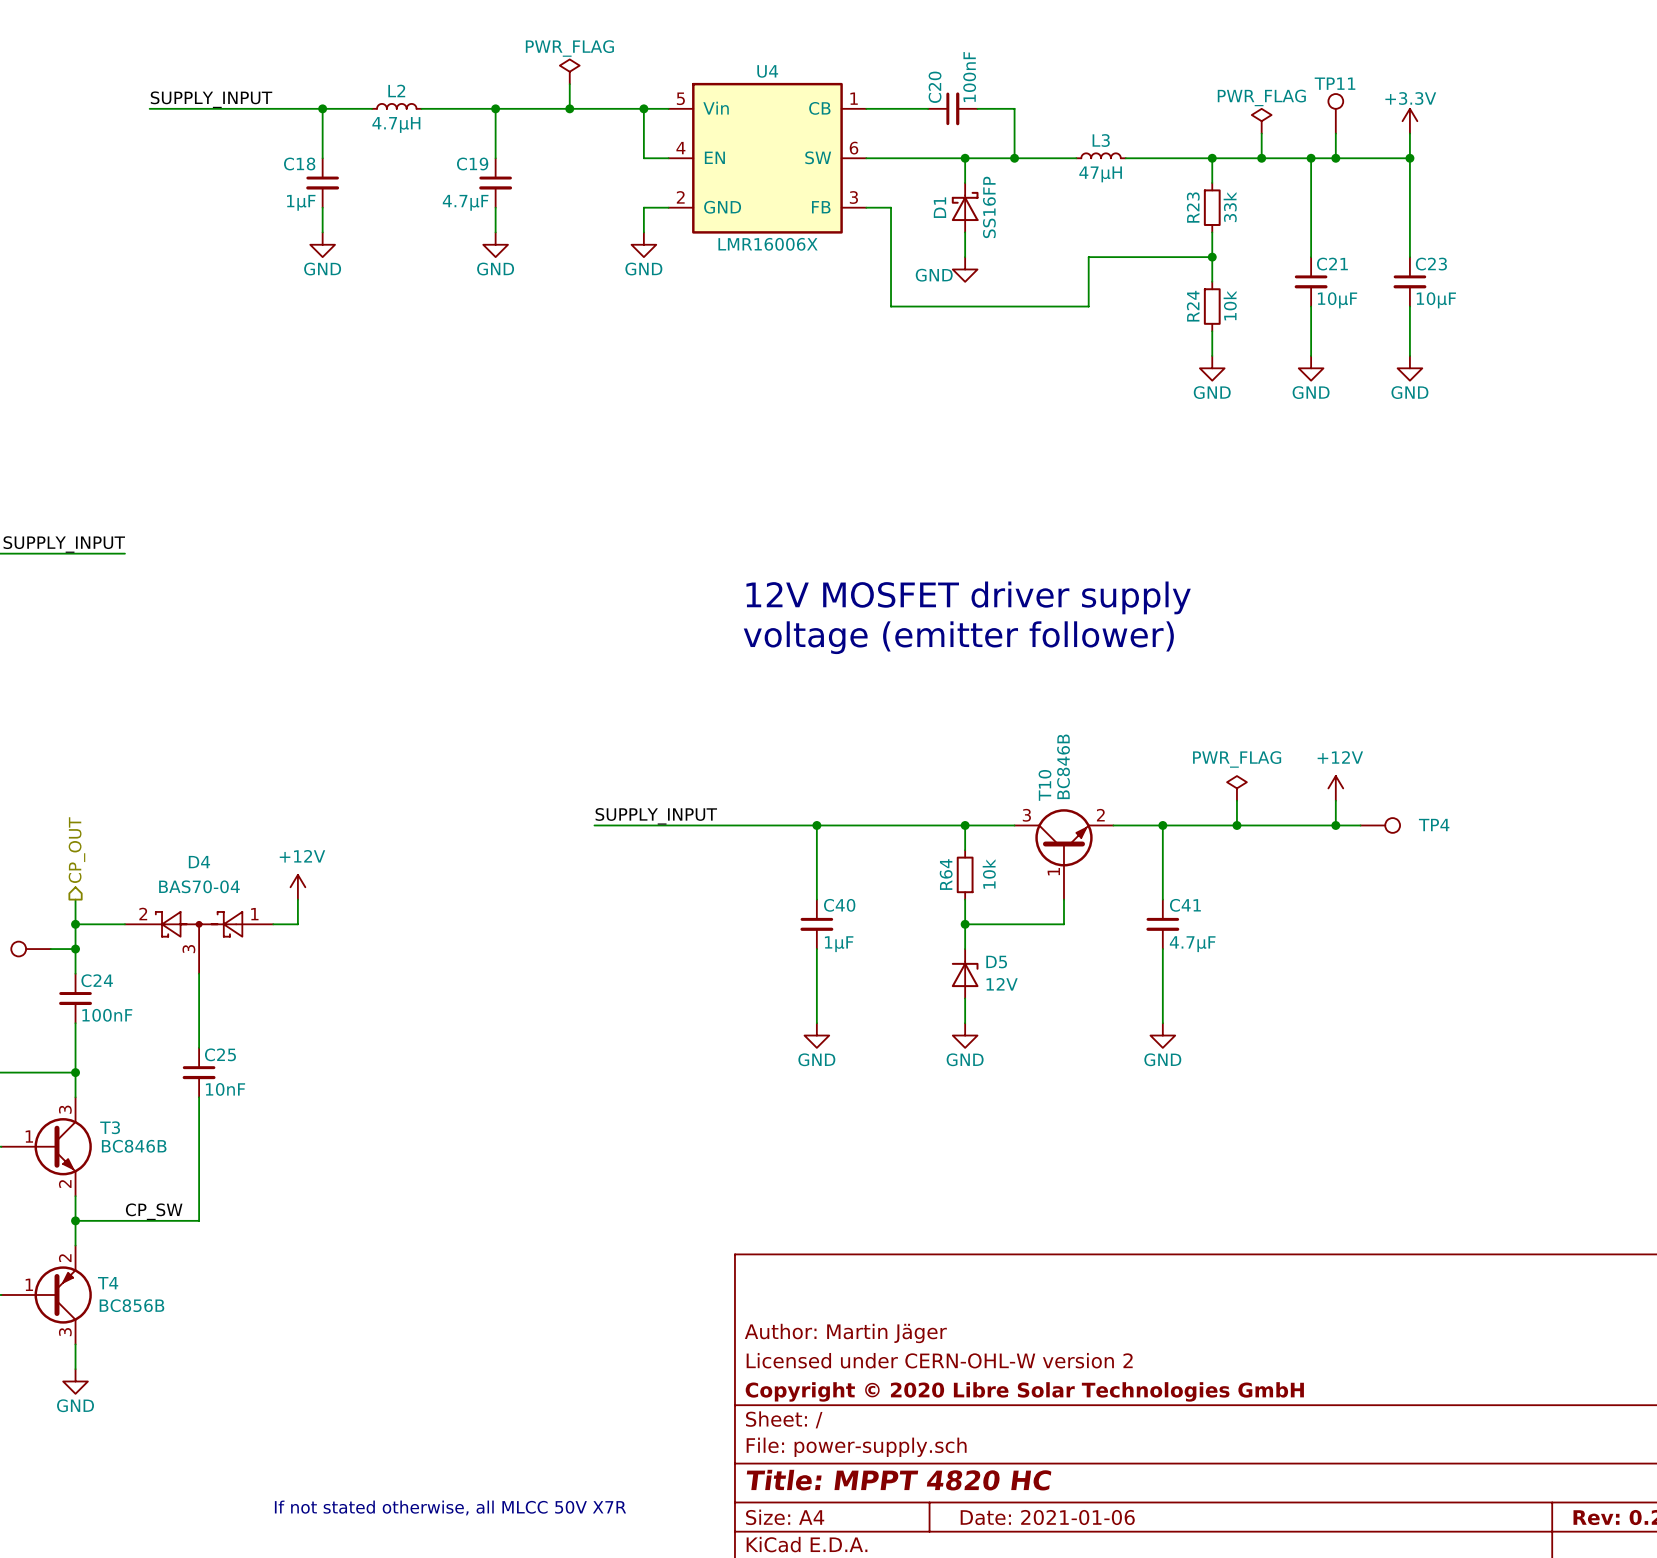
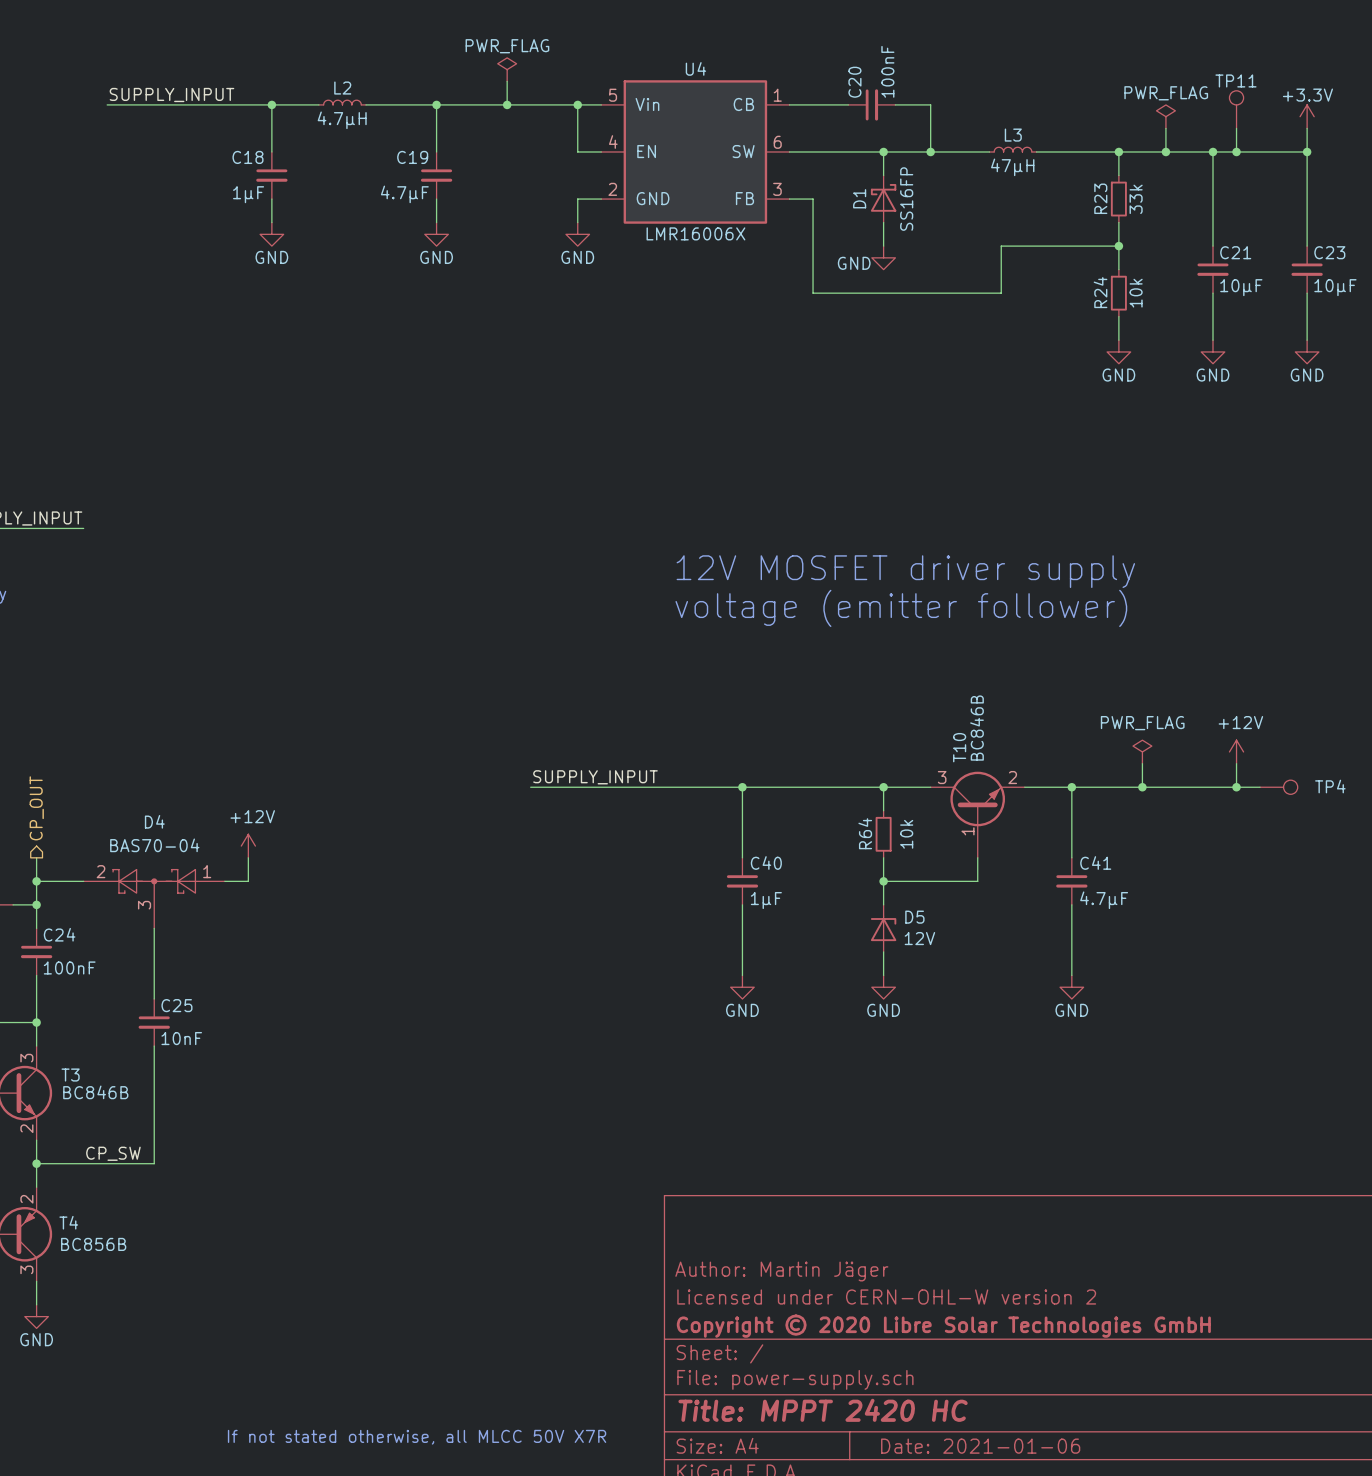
title block: Title: MPPT 4820 HC (899, 1480) -> Title: MPPT 2420 HC (823, 1410)

